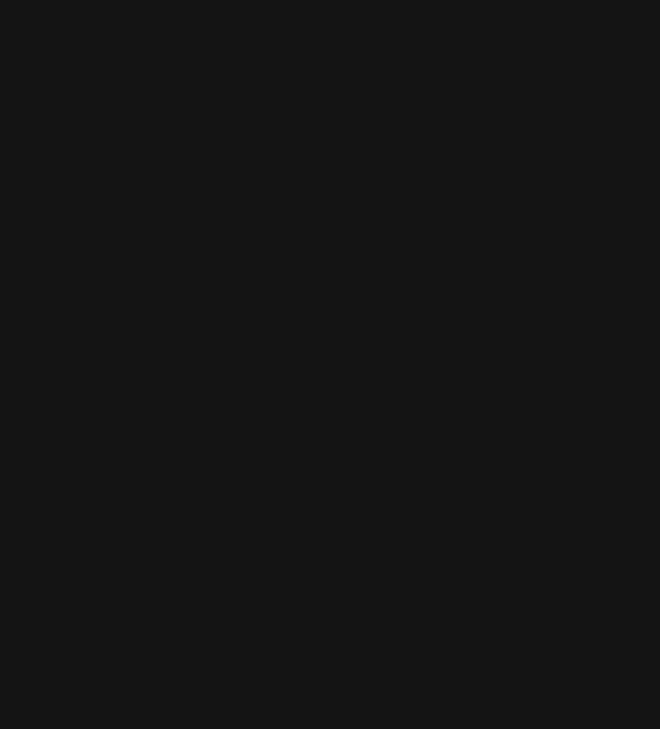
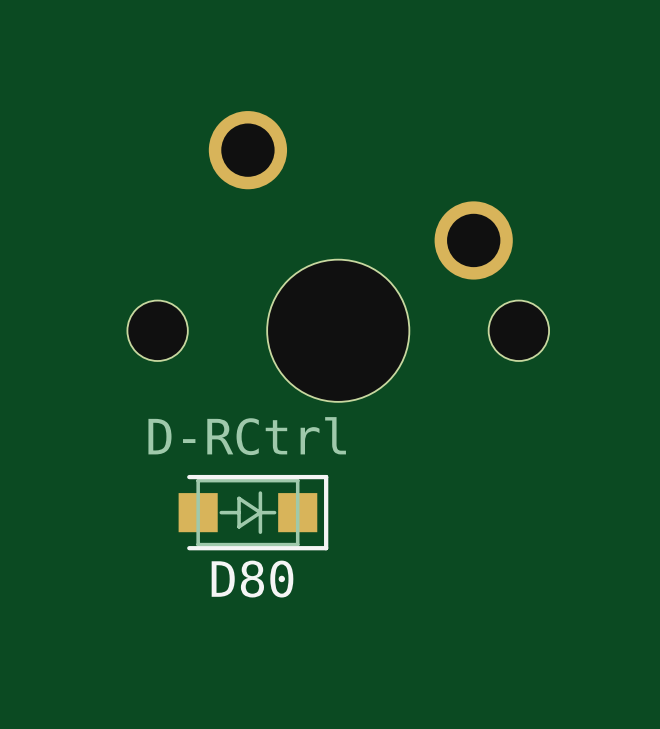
part: none -> (338, 256)
D80: none -> D-RCtrl (253, 512)

